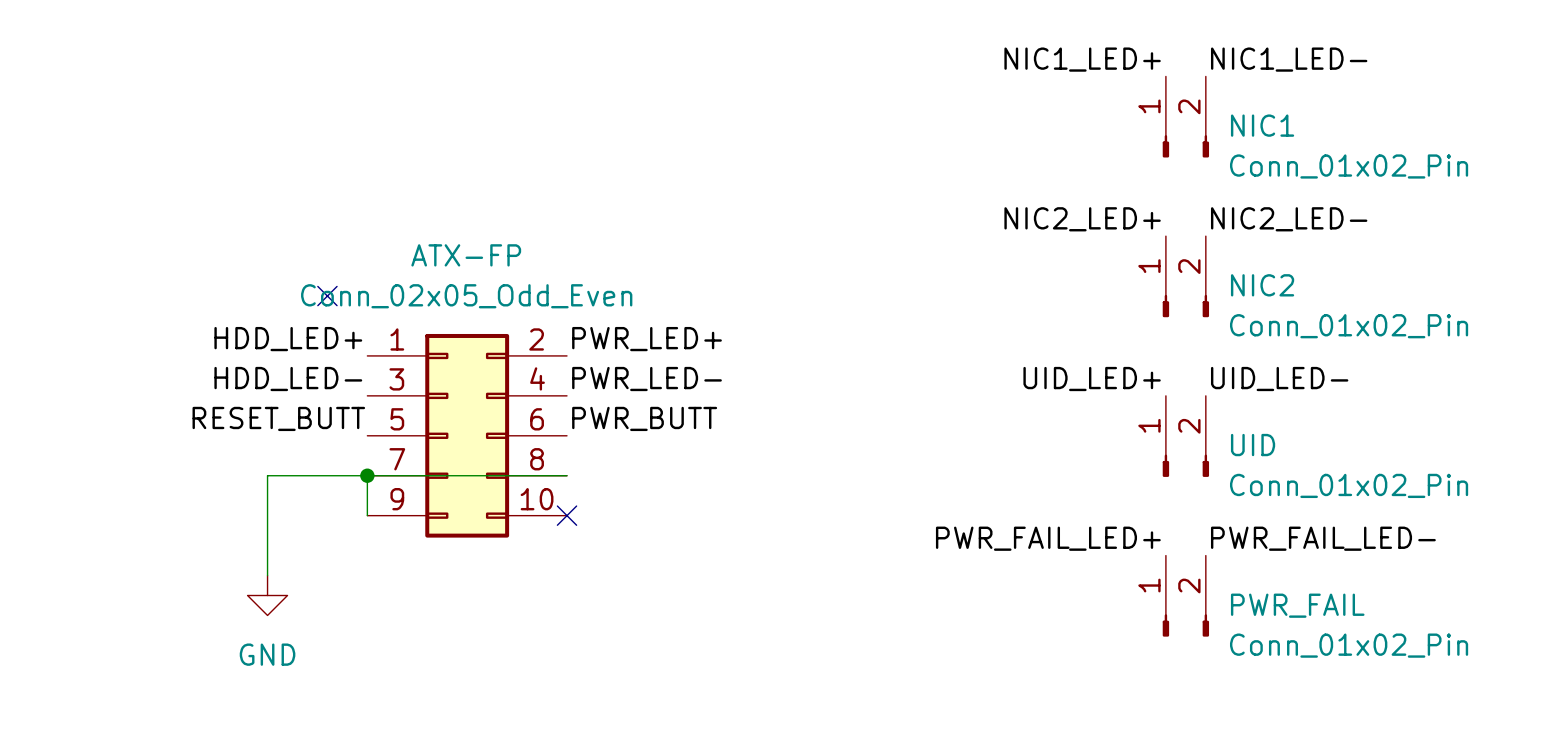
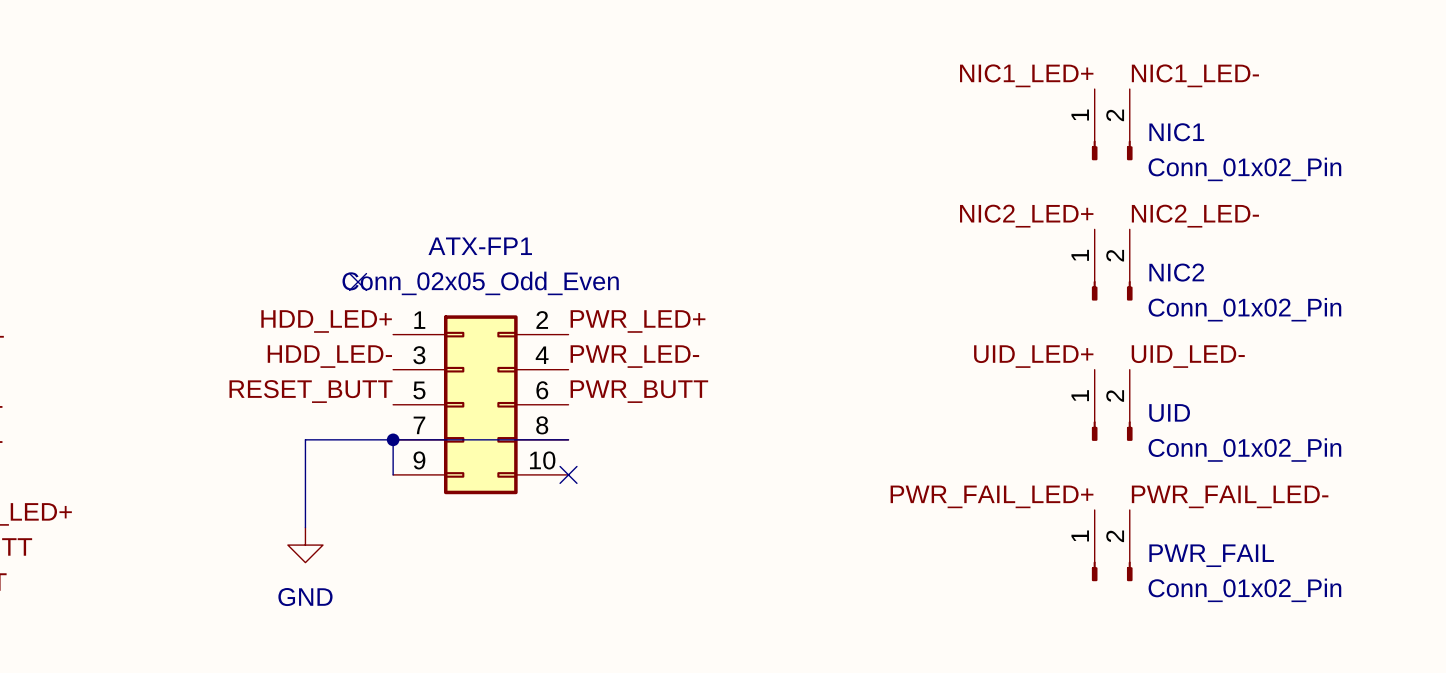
ATX-FP name: ATX-FP (466, 255) -> ATX-FP1 (480, 246)

